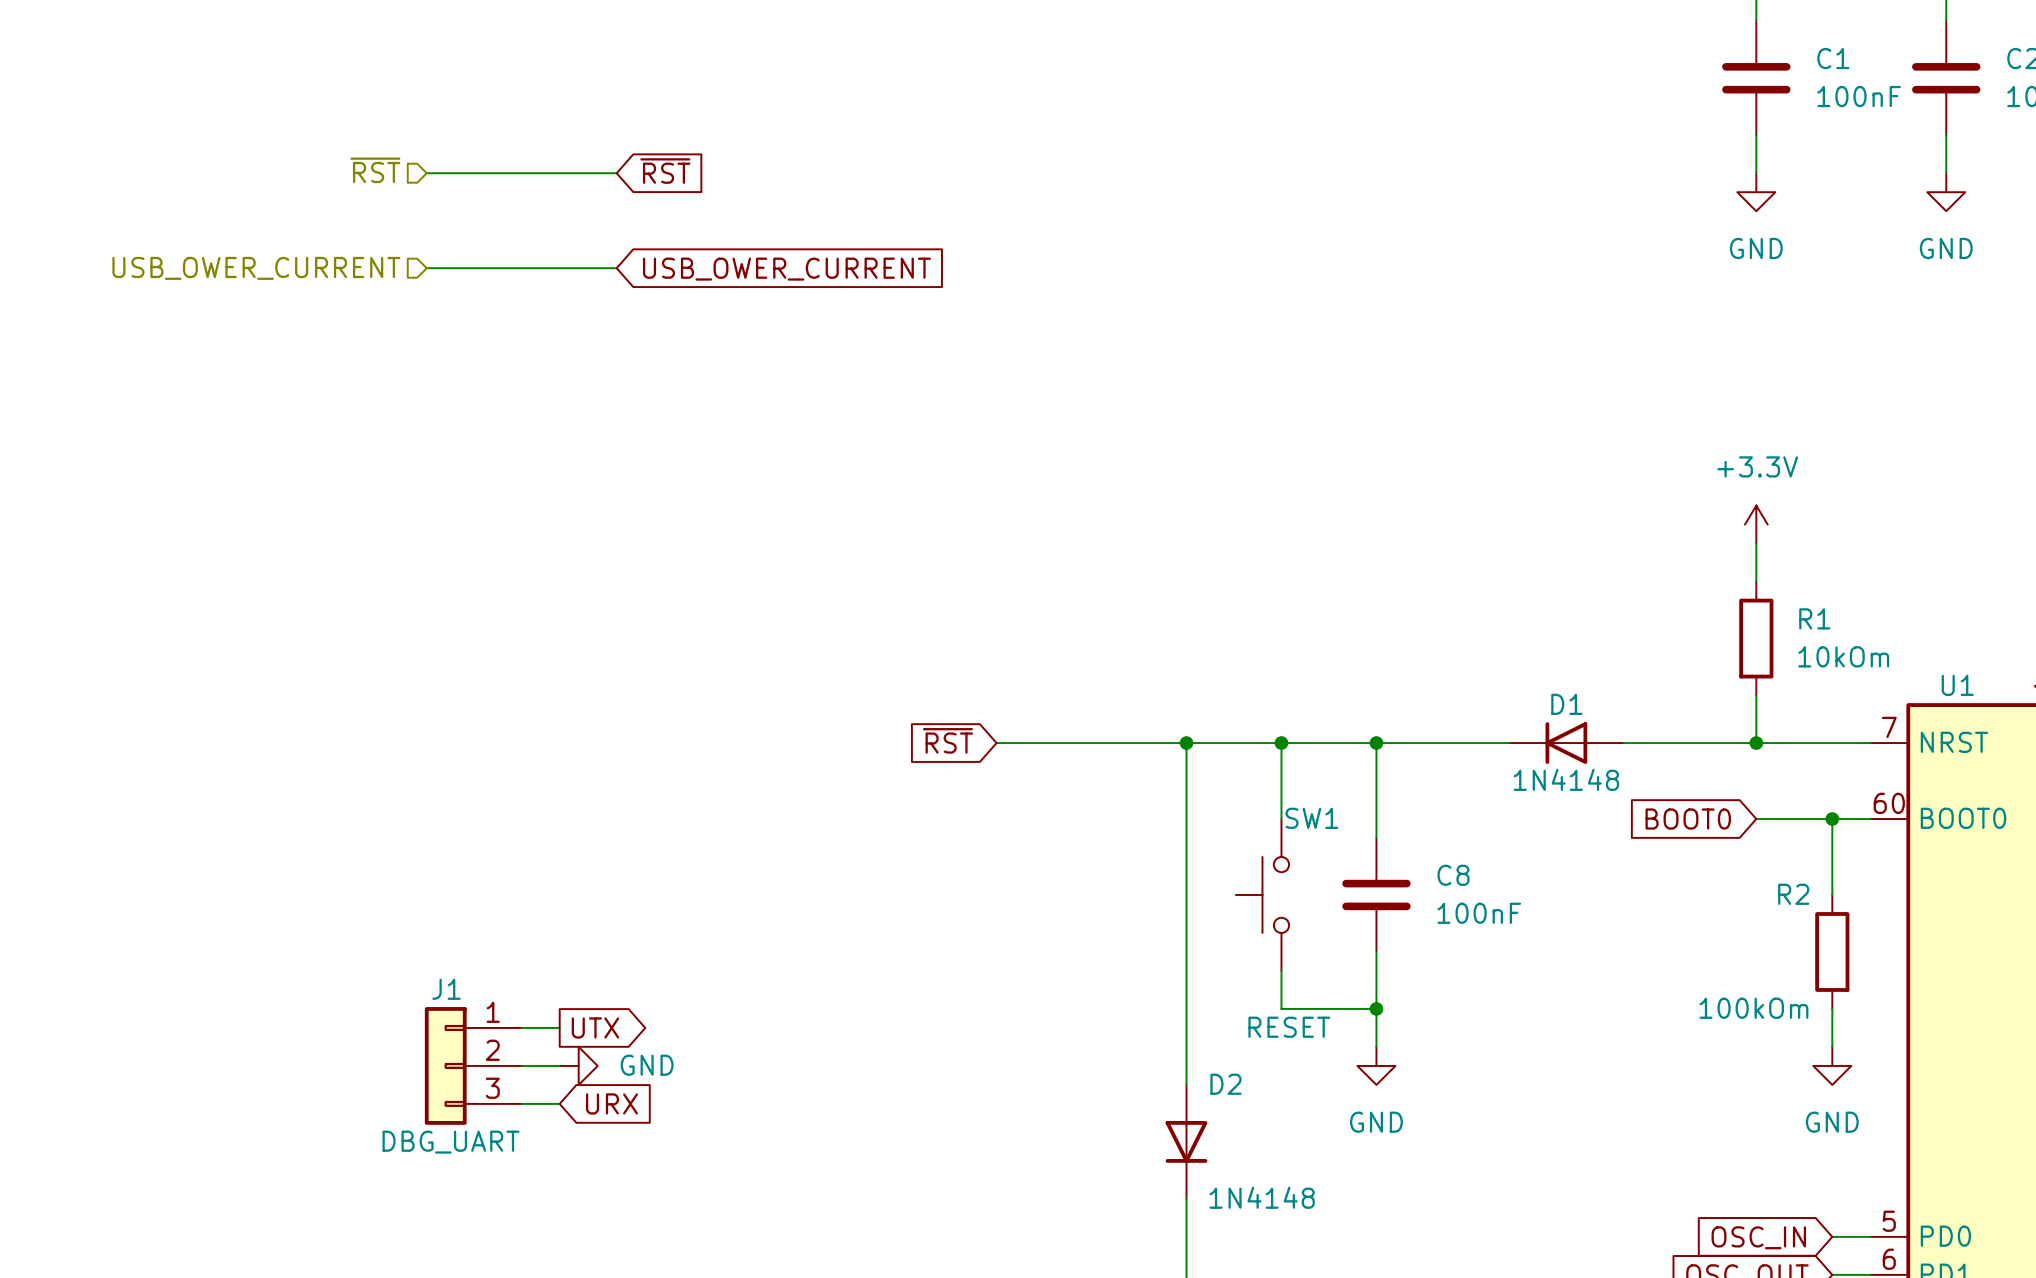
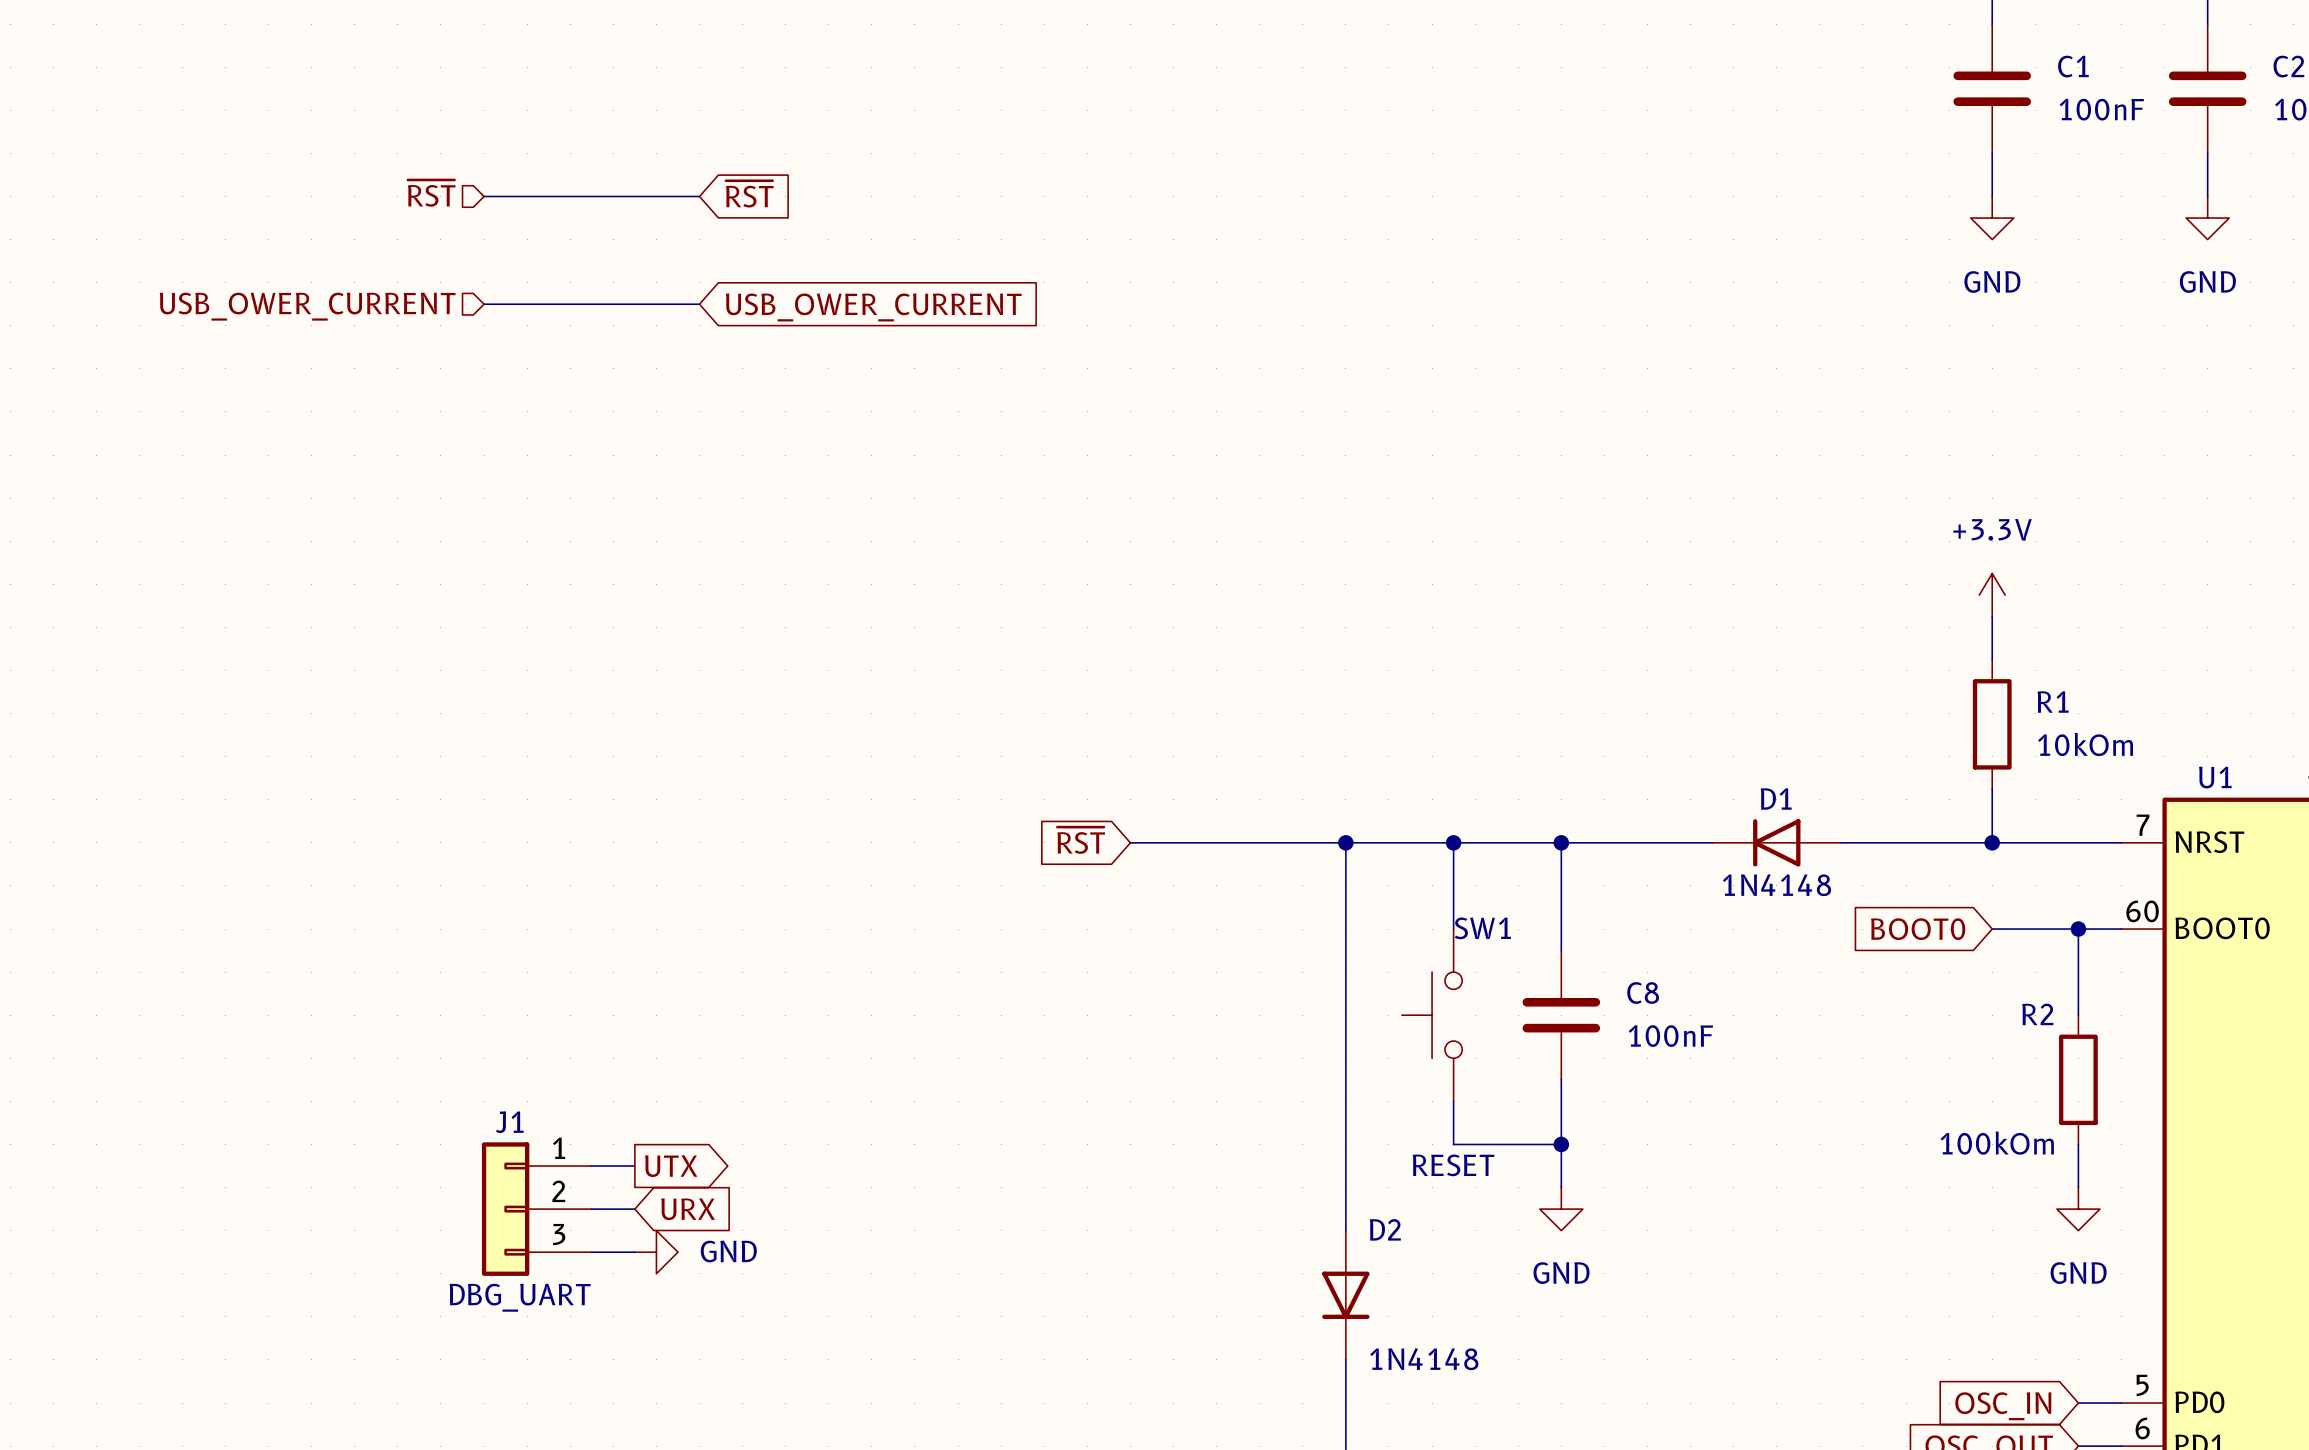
power symbol position: GND (578, 1065) -> GND (656, 1252)
global label position: URX (611, 1103) -> URX (688, 1209)

